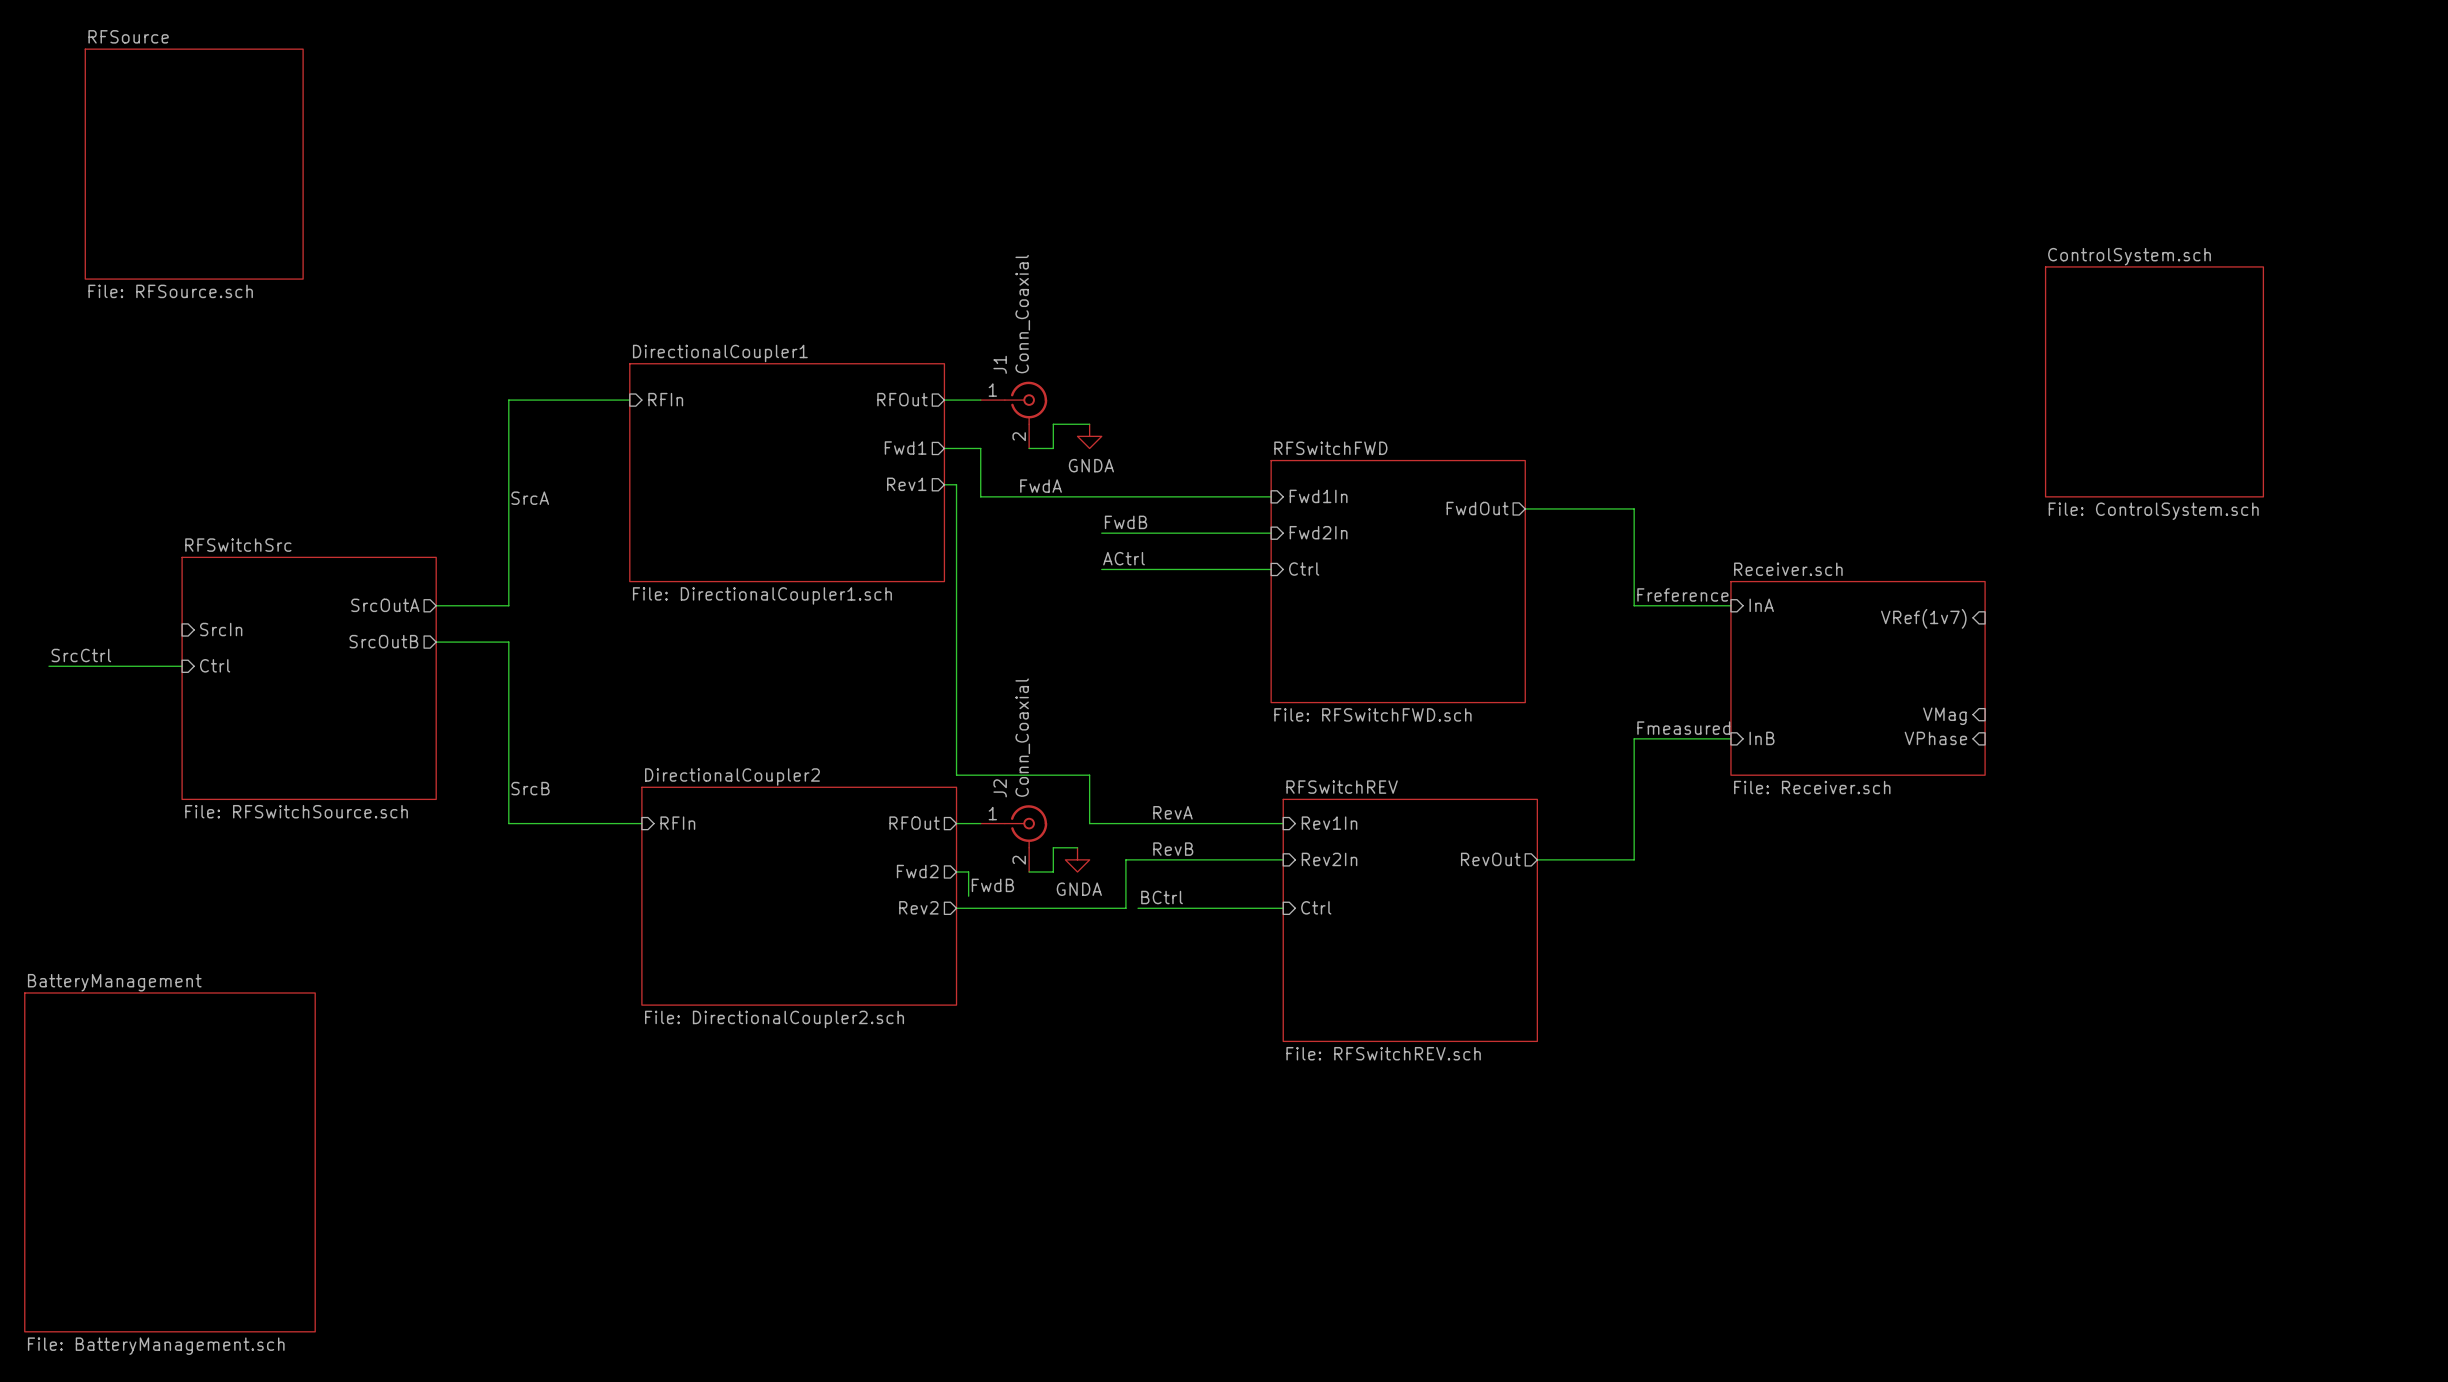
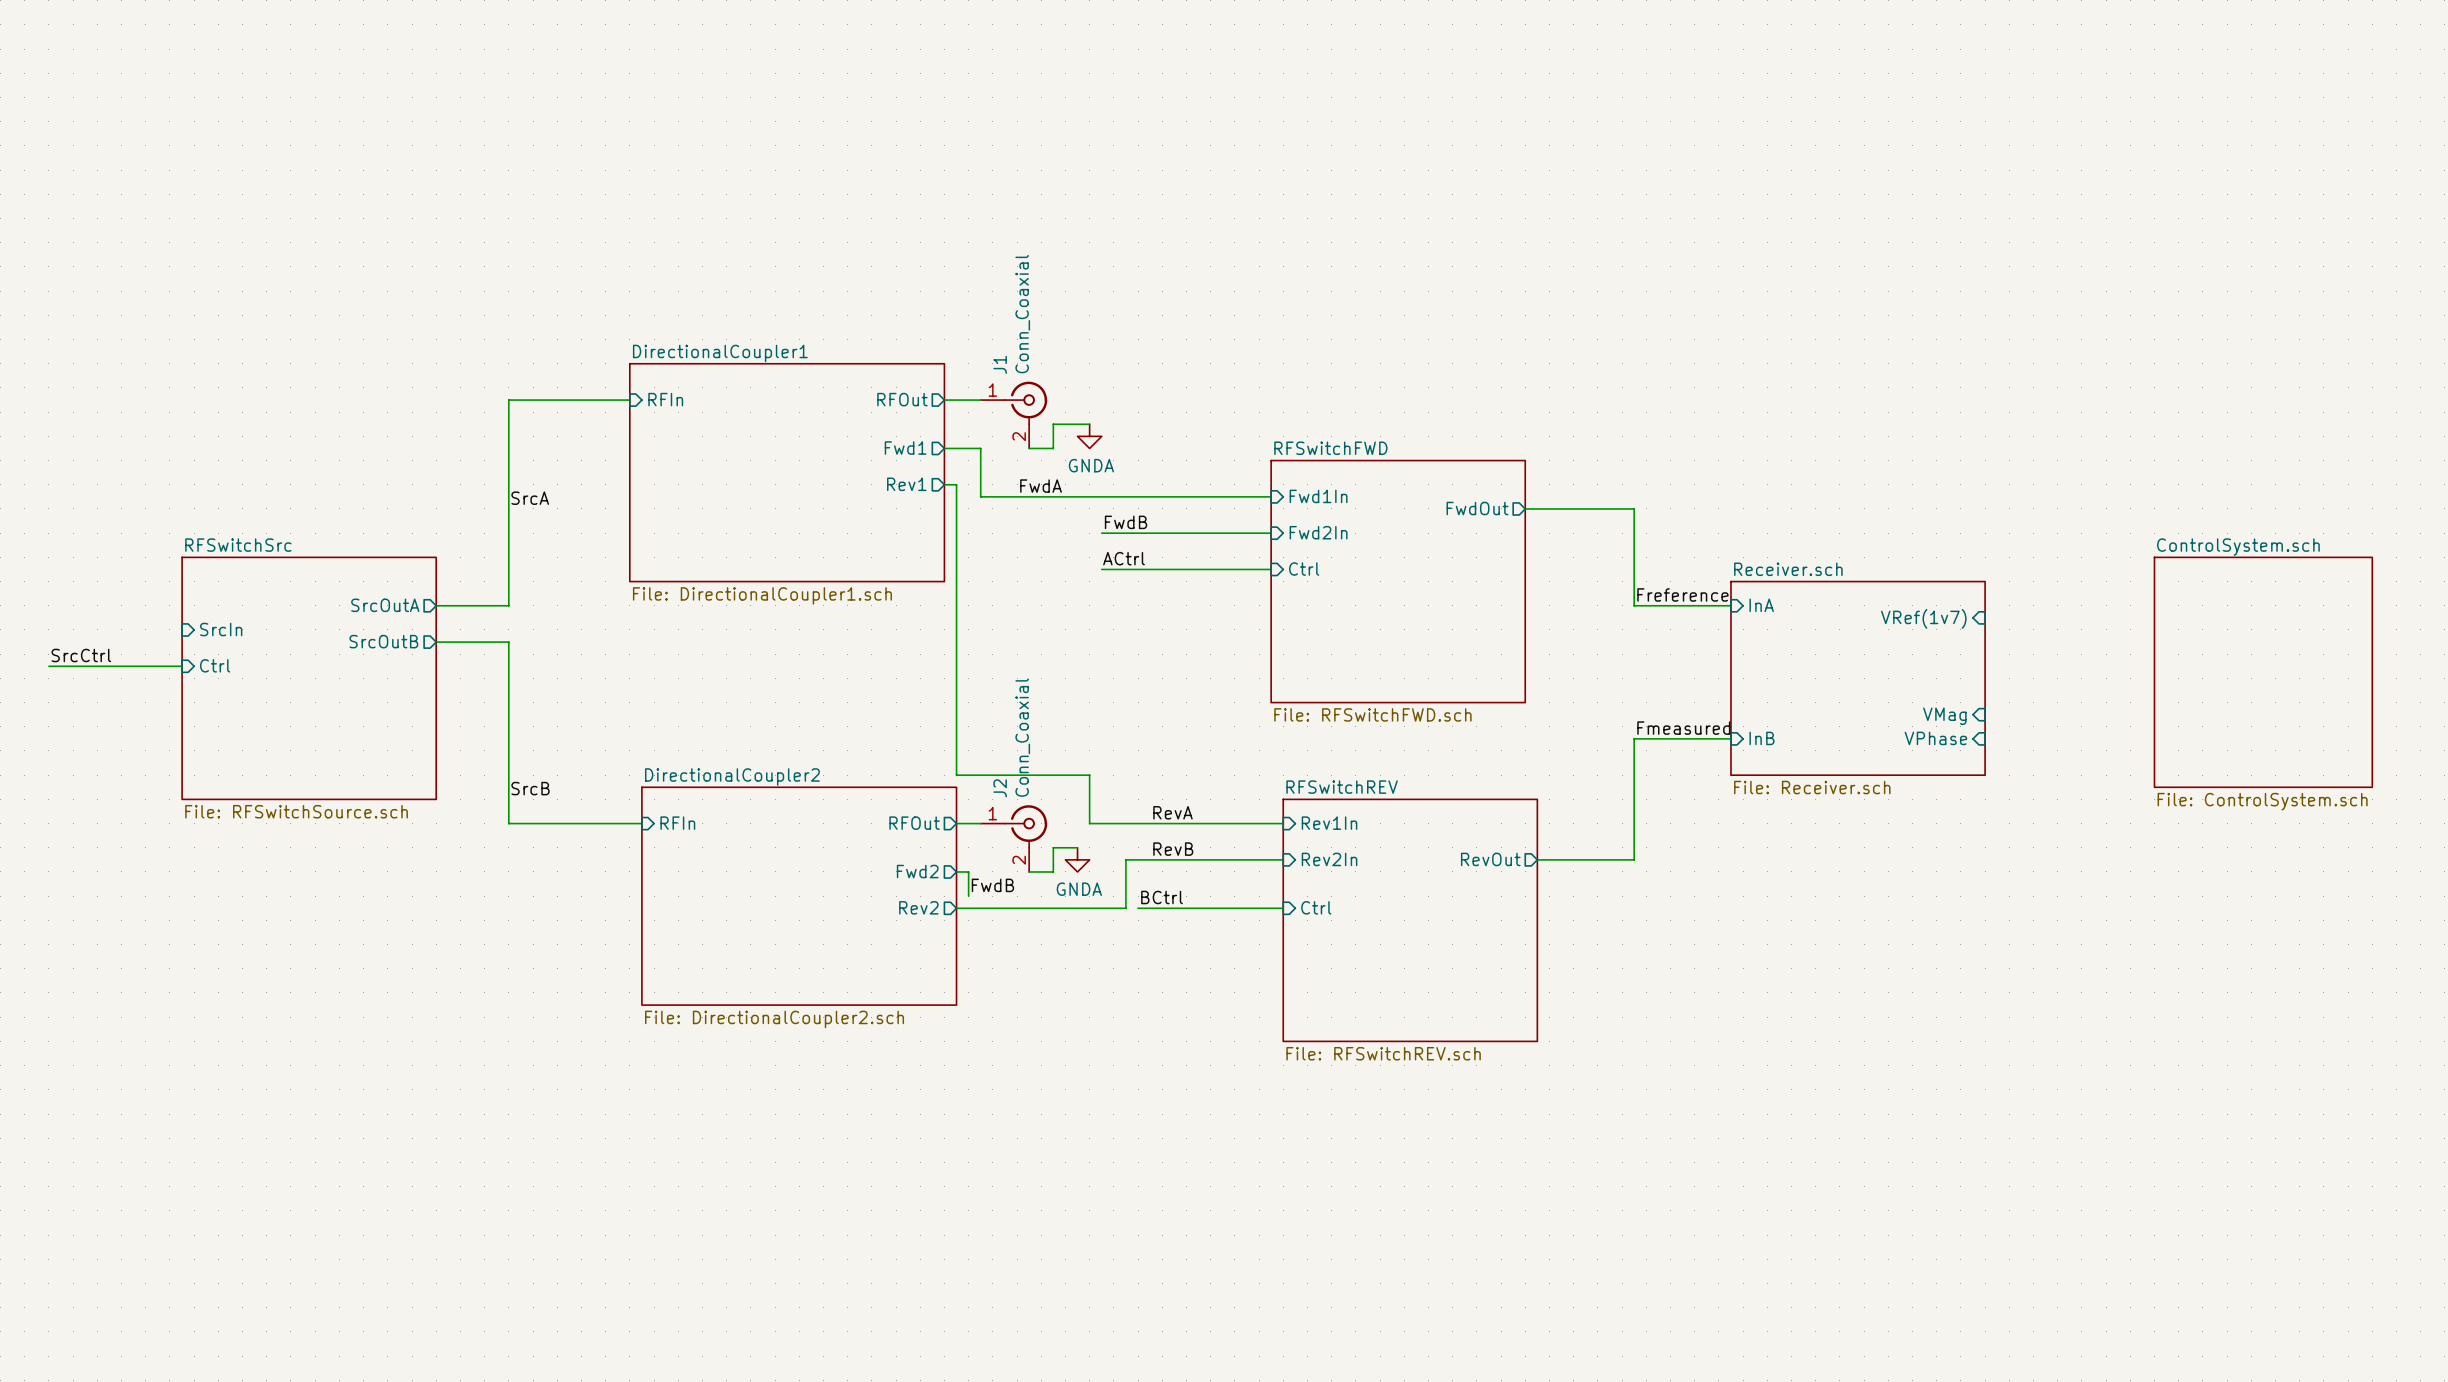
sheet RFSource: File: RFSource.sch (194, 164) -> none
sheet ControlSystem.sch: File: ControlSystem.sch (2154, 381) -> none
sheet ControlSystem.sch: none -> File: ControlSystem.sch (2263, 672)
sheet BatteryManagement: File: BatteryManagement.sch (169, 1162) -> none

